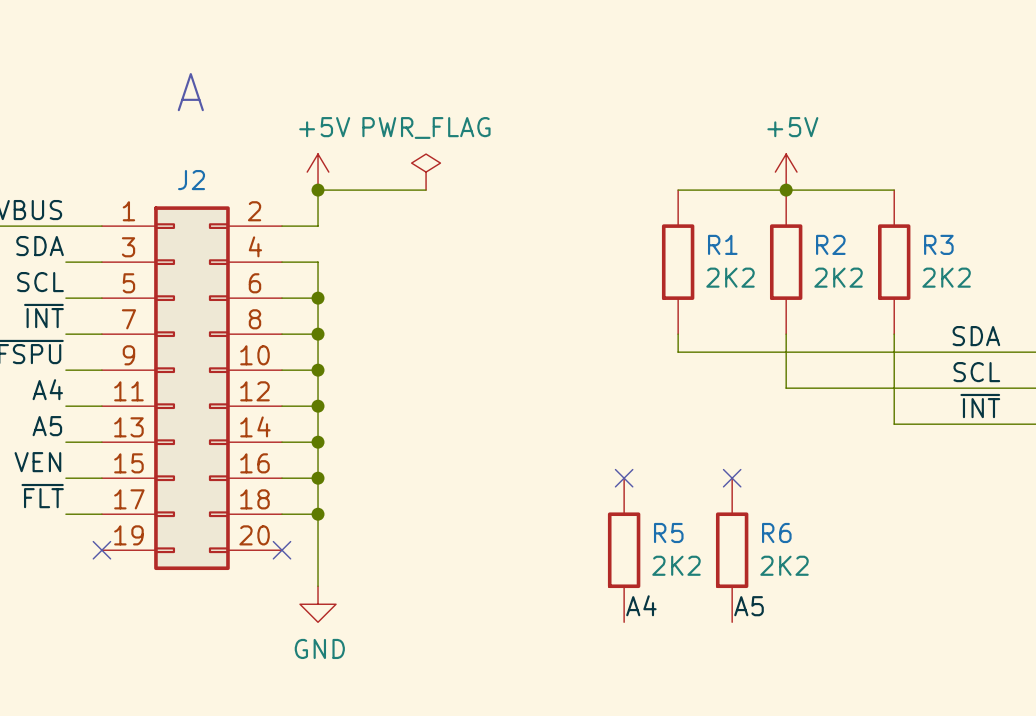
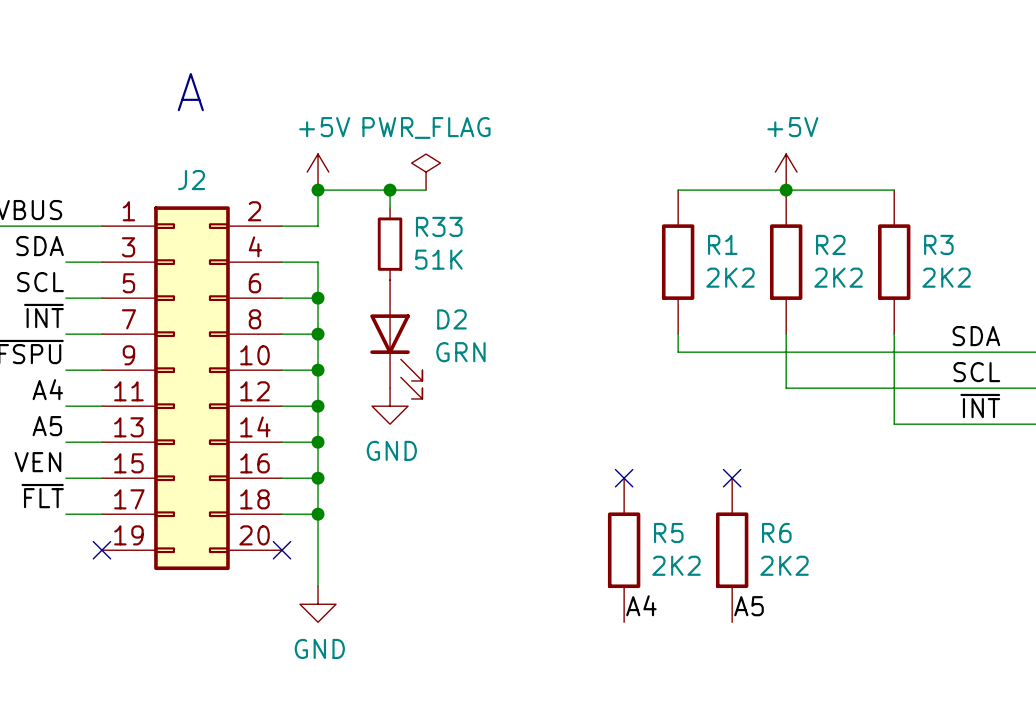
wire: none -> (390, 190) (390, 208)
junction: none -> (390, 190)
R33: none -> 51K (390, 244)
D2: none -> GRN (396, 339)
power symbol: none -> GND (390, 406)

